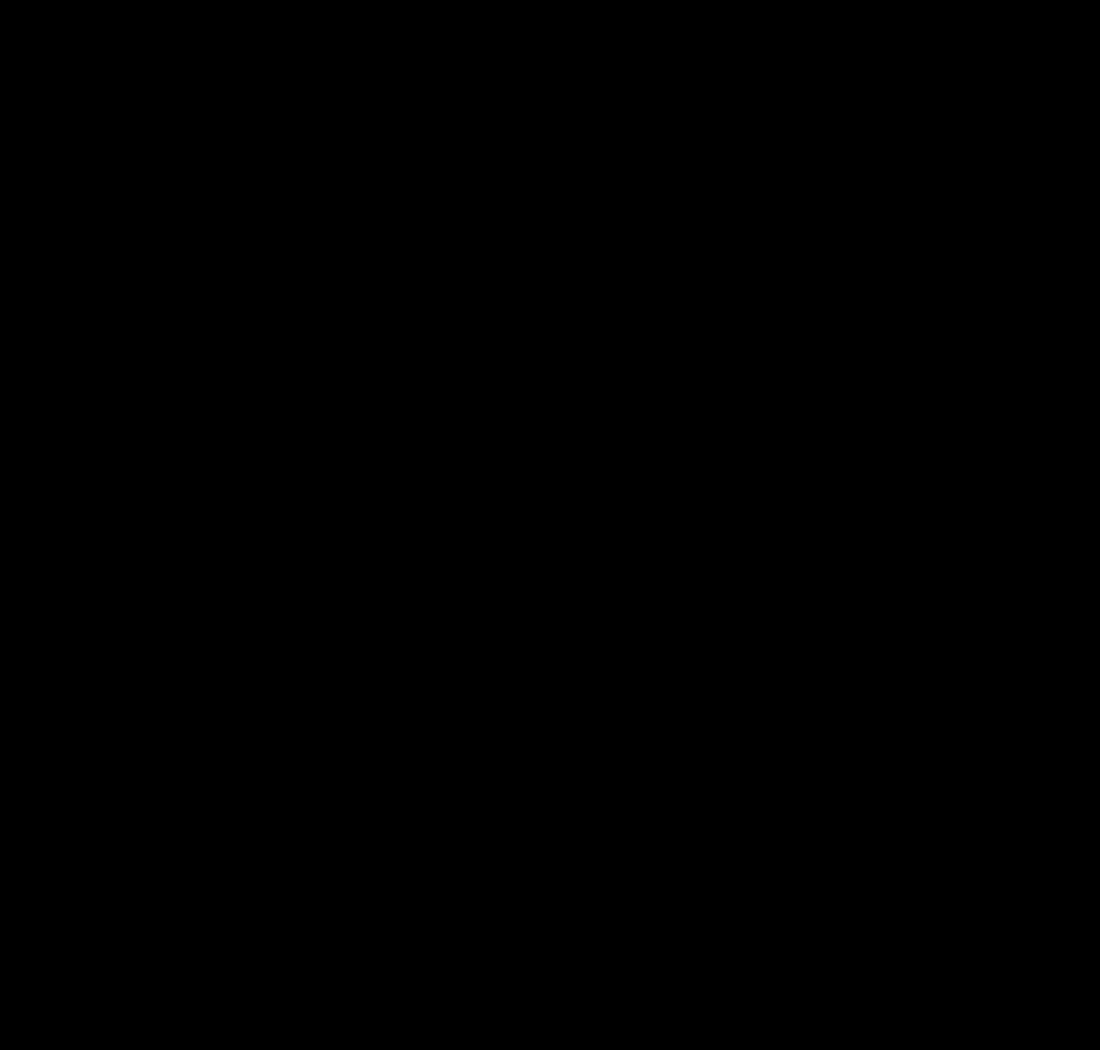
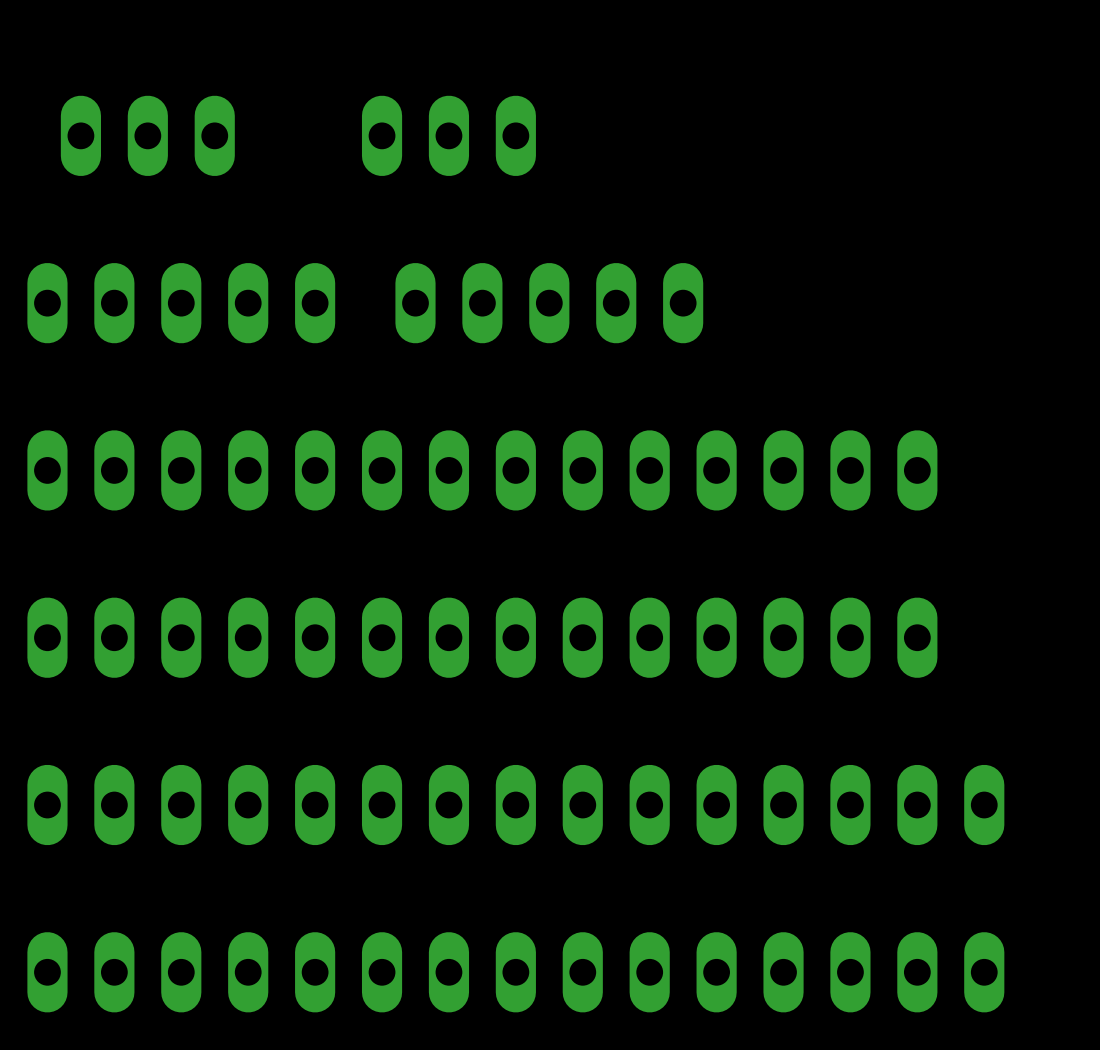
part: none -> (147, 135)
part: none -> (448, 135)
part: none -> (181, 303)
part: none -> (549, 303)
part: none -> (482, 470)
part: none -> (482, 637)
part: none -> (515, 805)
part: none -> (515, 972)

